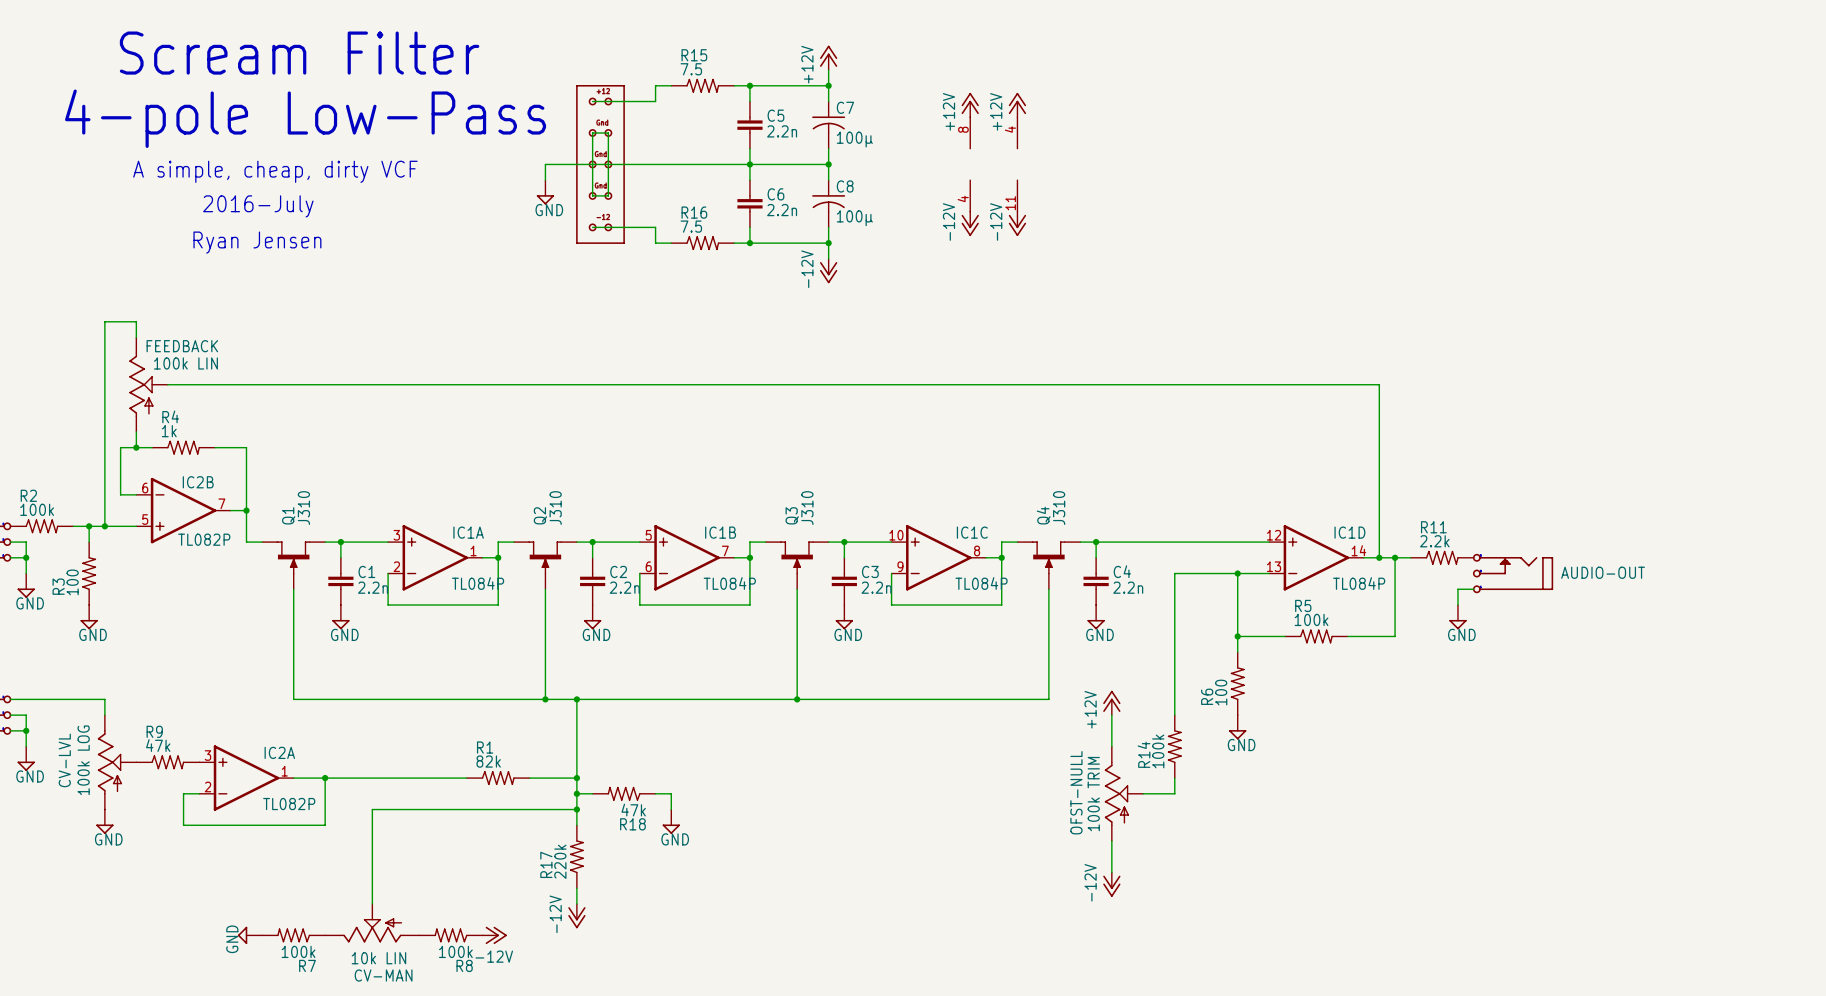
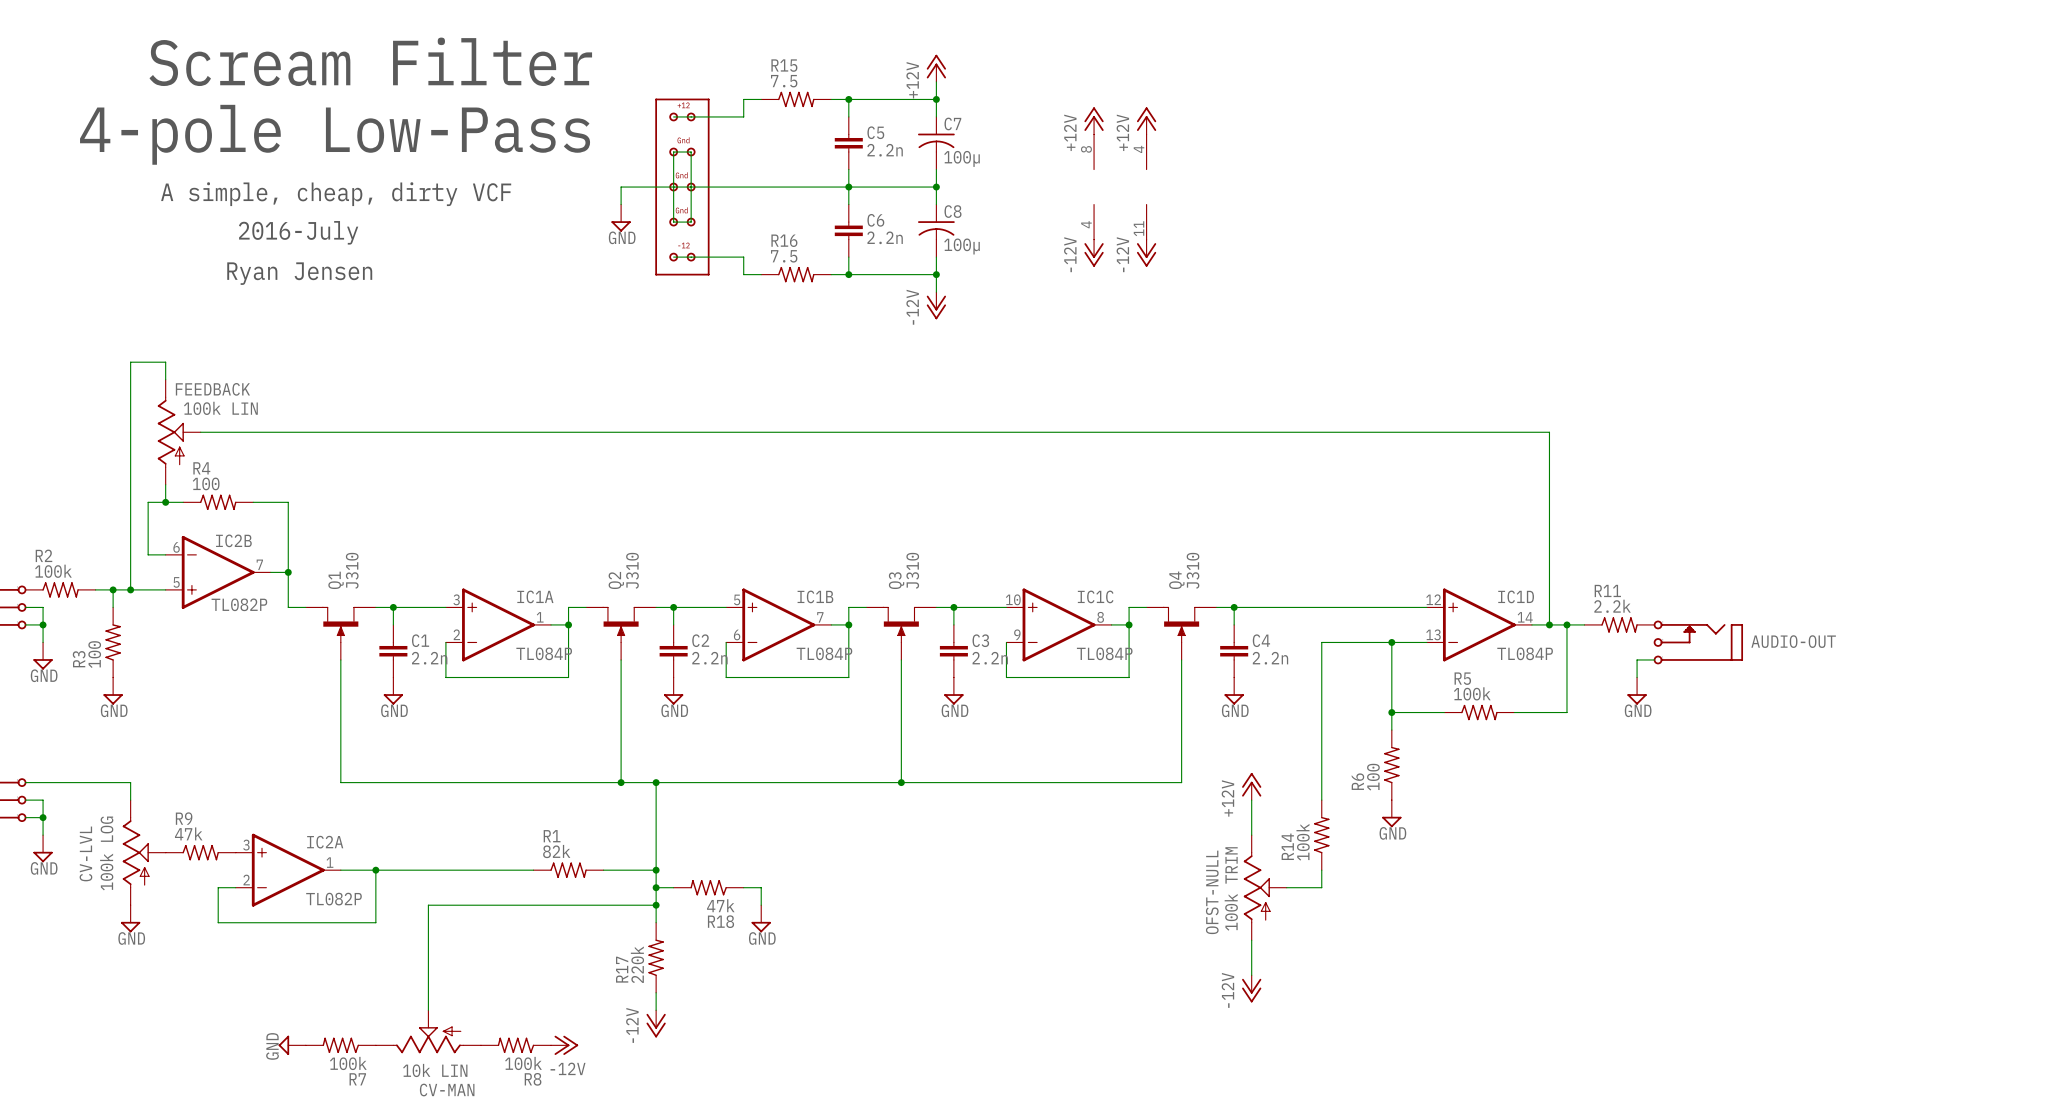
R4 value: 1k (169, 431) -> 100 (206, 483)

